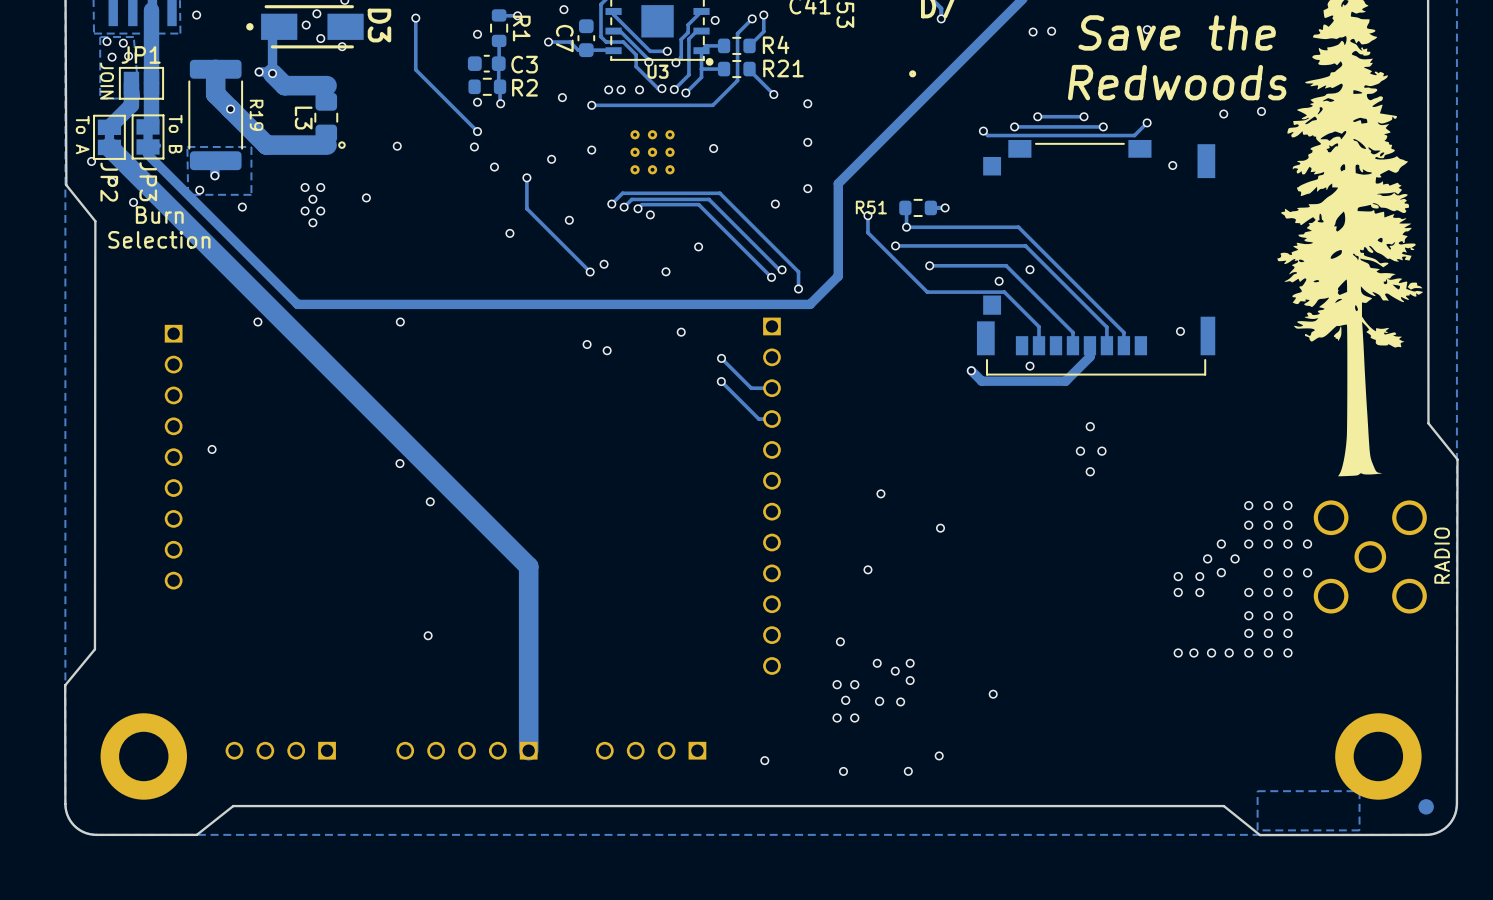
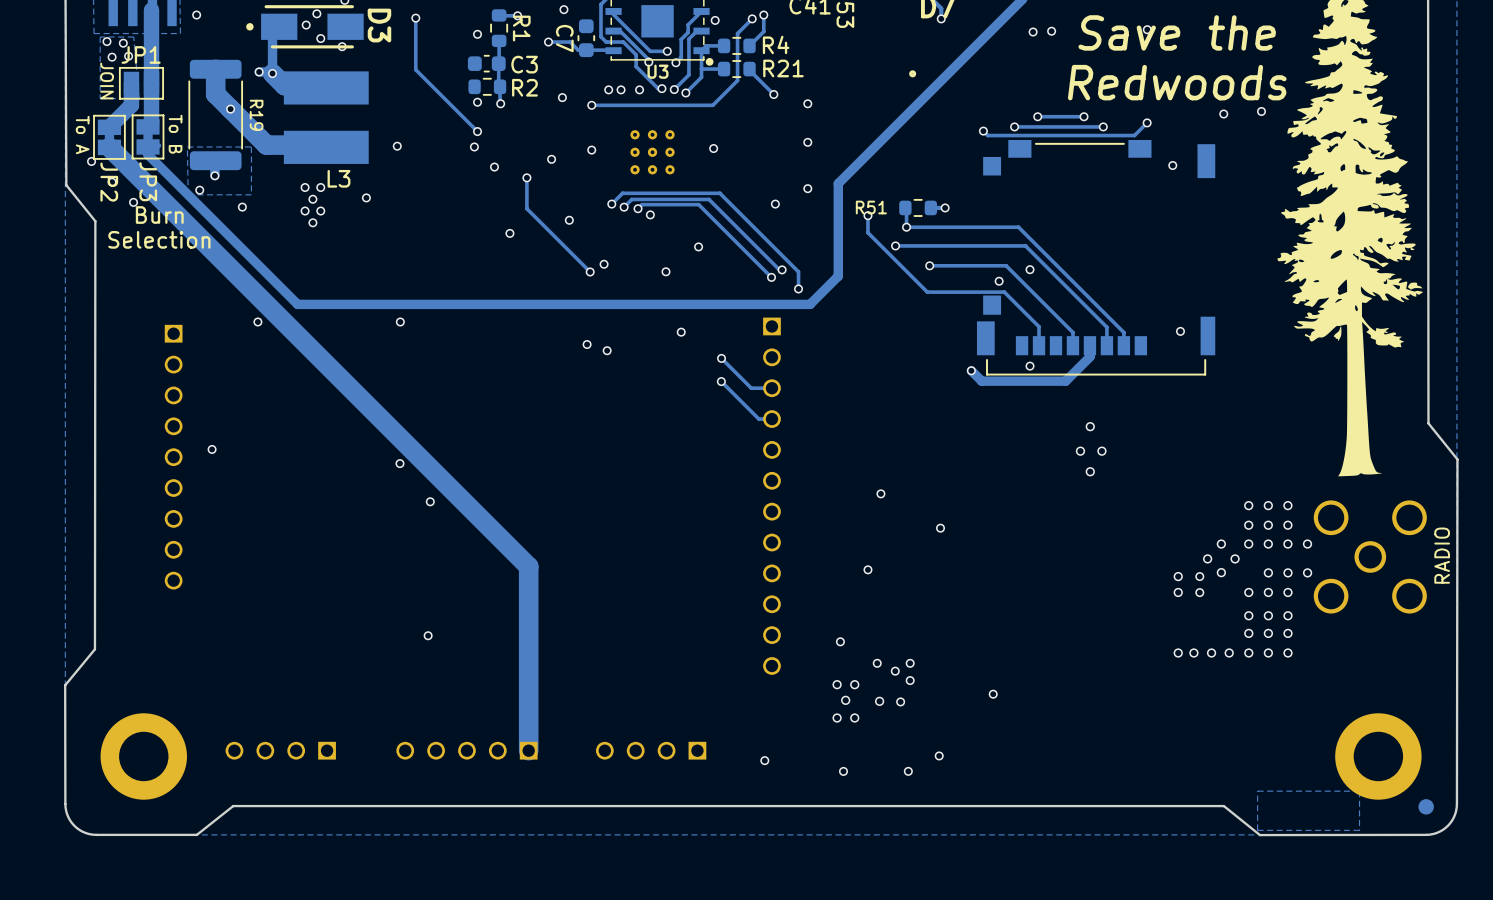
L3 footprint: [314, 92, 346, 149] -> [283, 71, 369, 164]
L3 name position: L3 (303, 118) -> L3 (338, 178)

